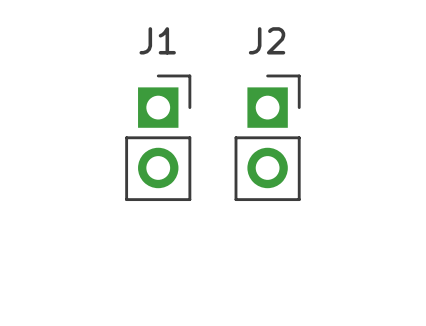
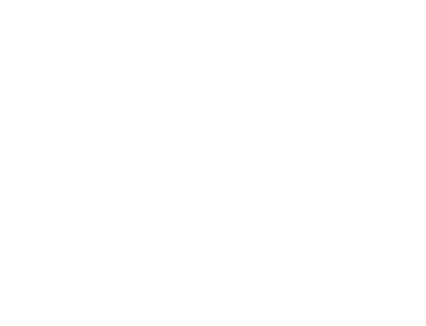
J1: (158, 137) -> none
J2: (267, 137) -> none

